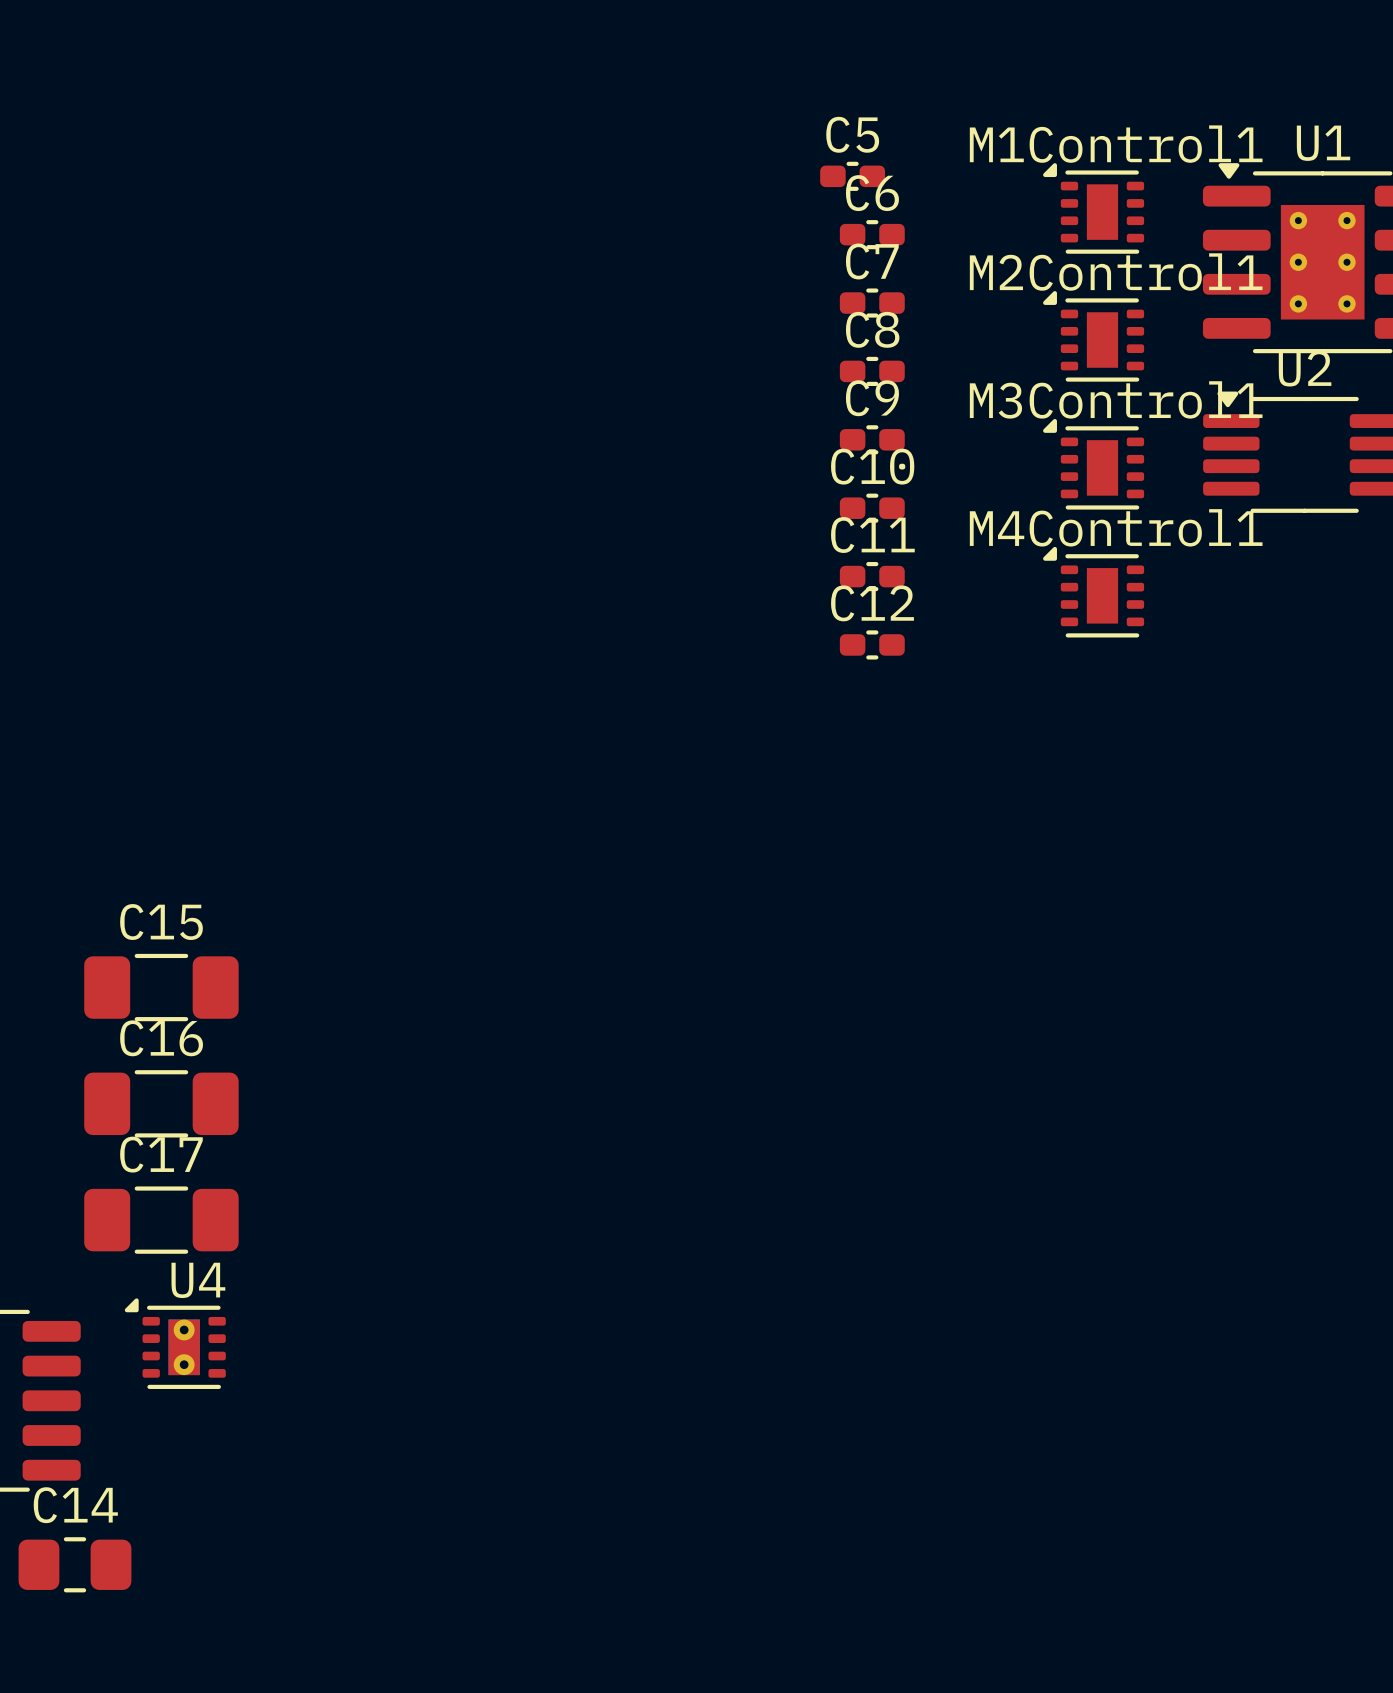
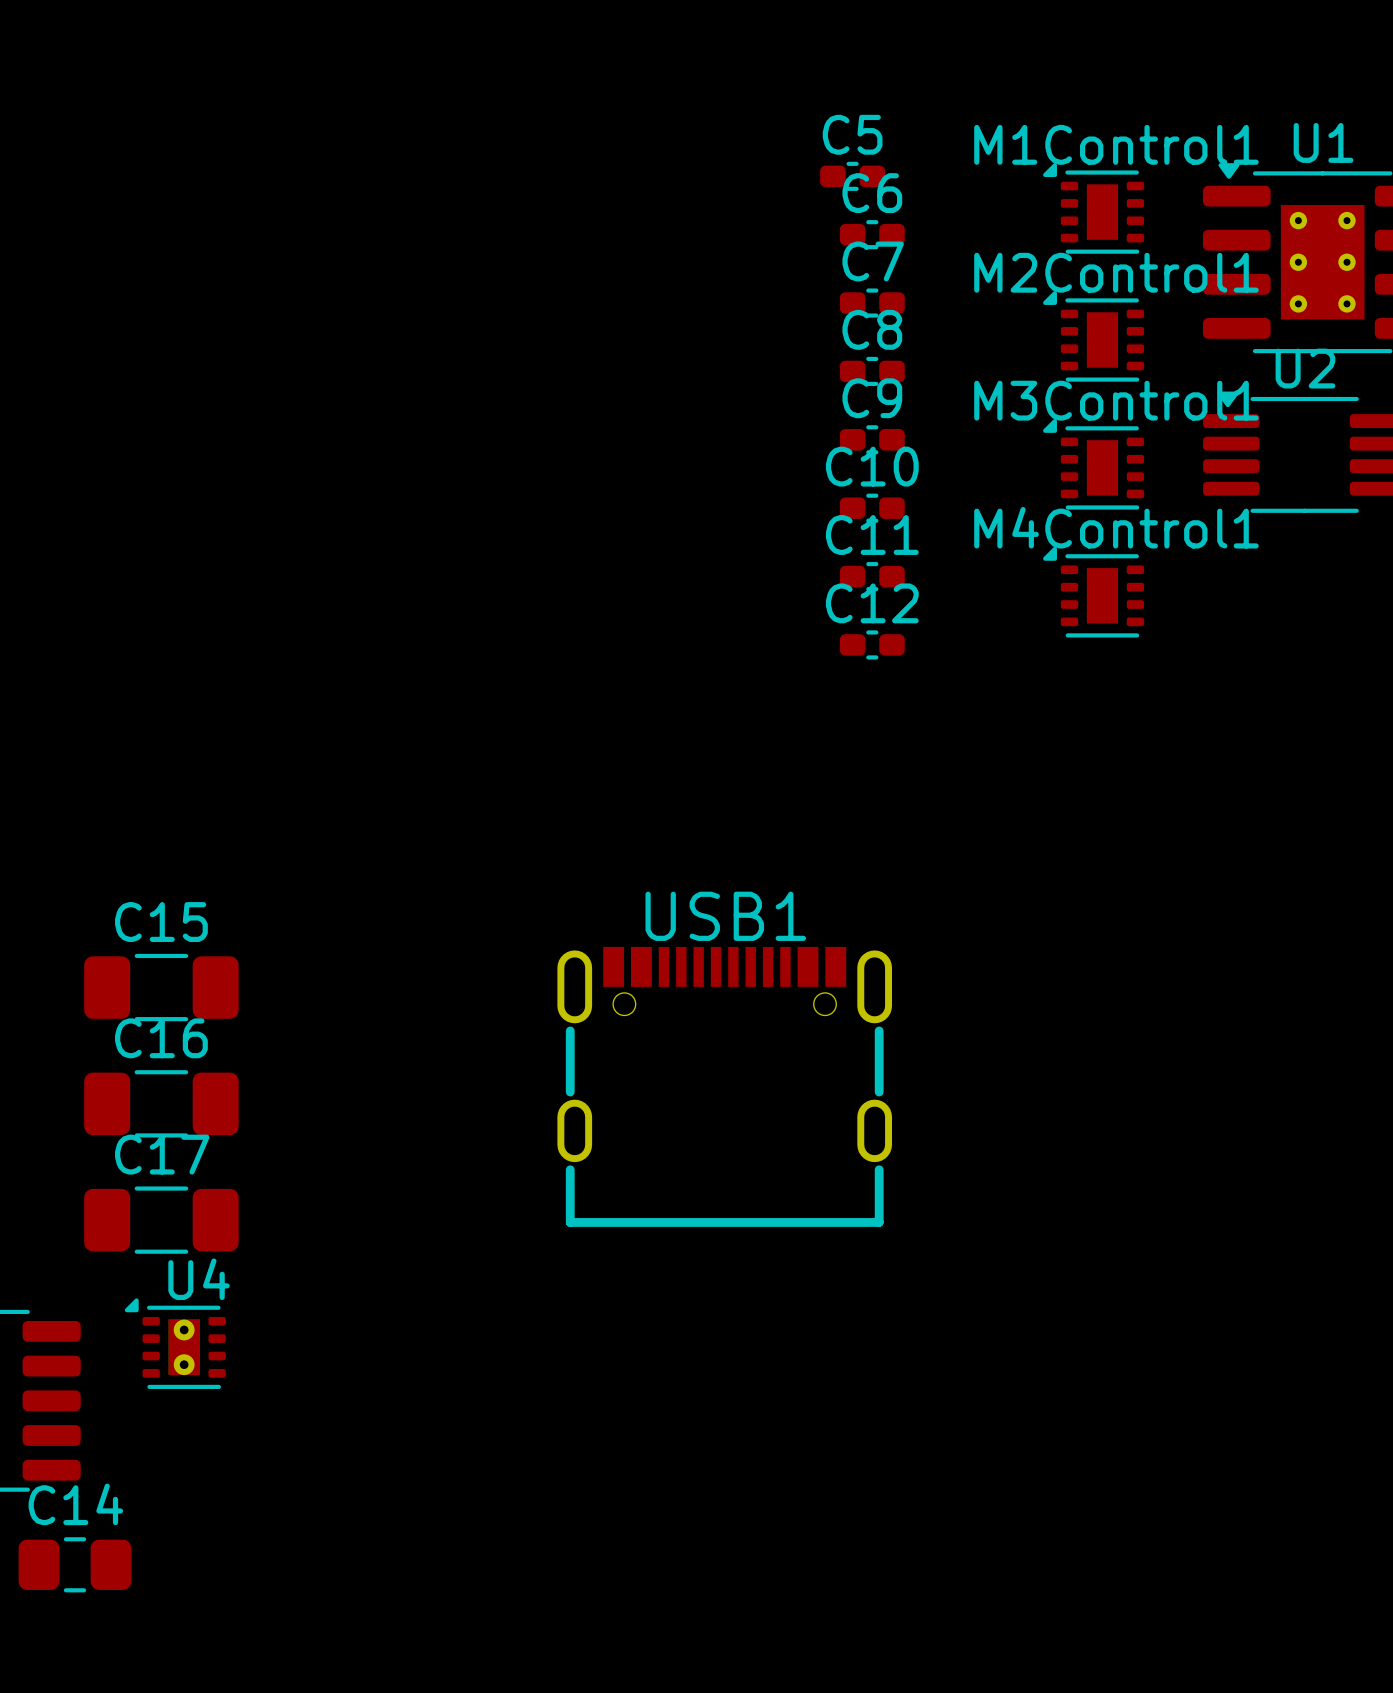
USB1: none -> (724, 1086)

